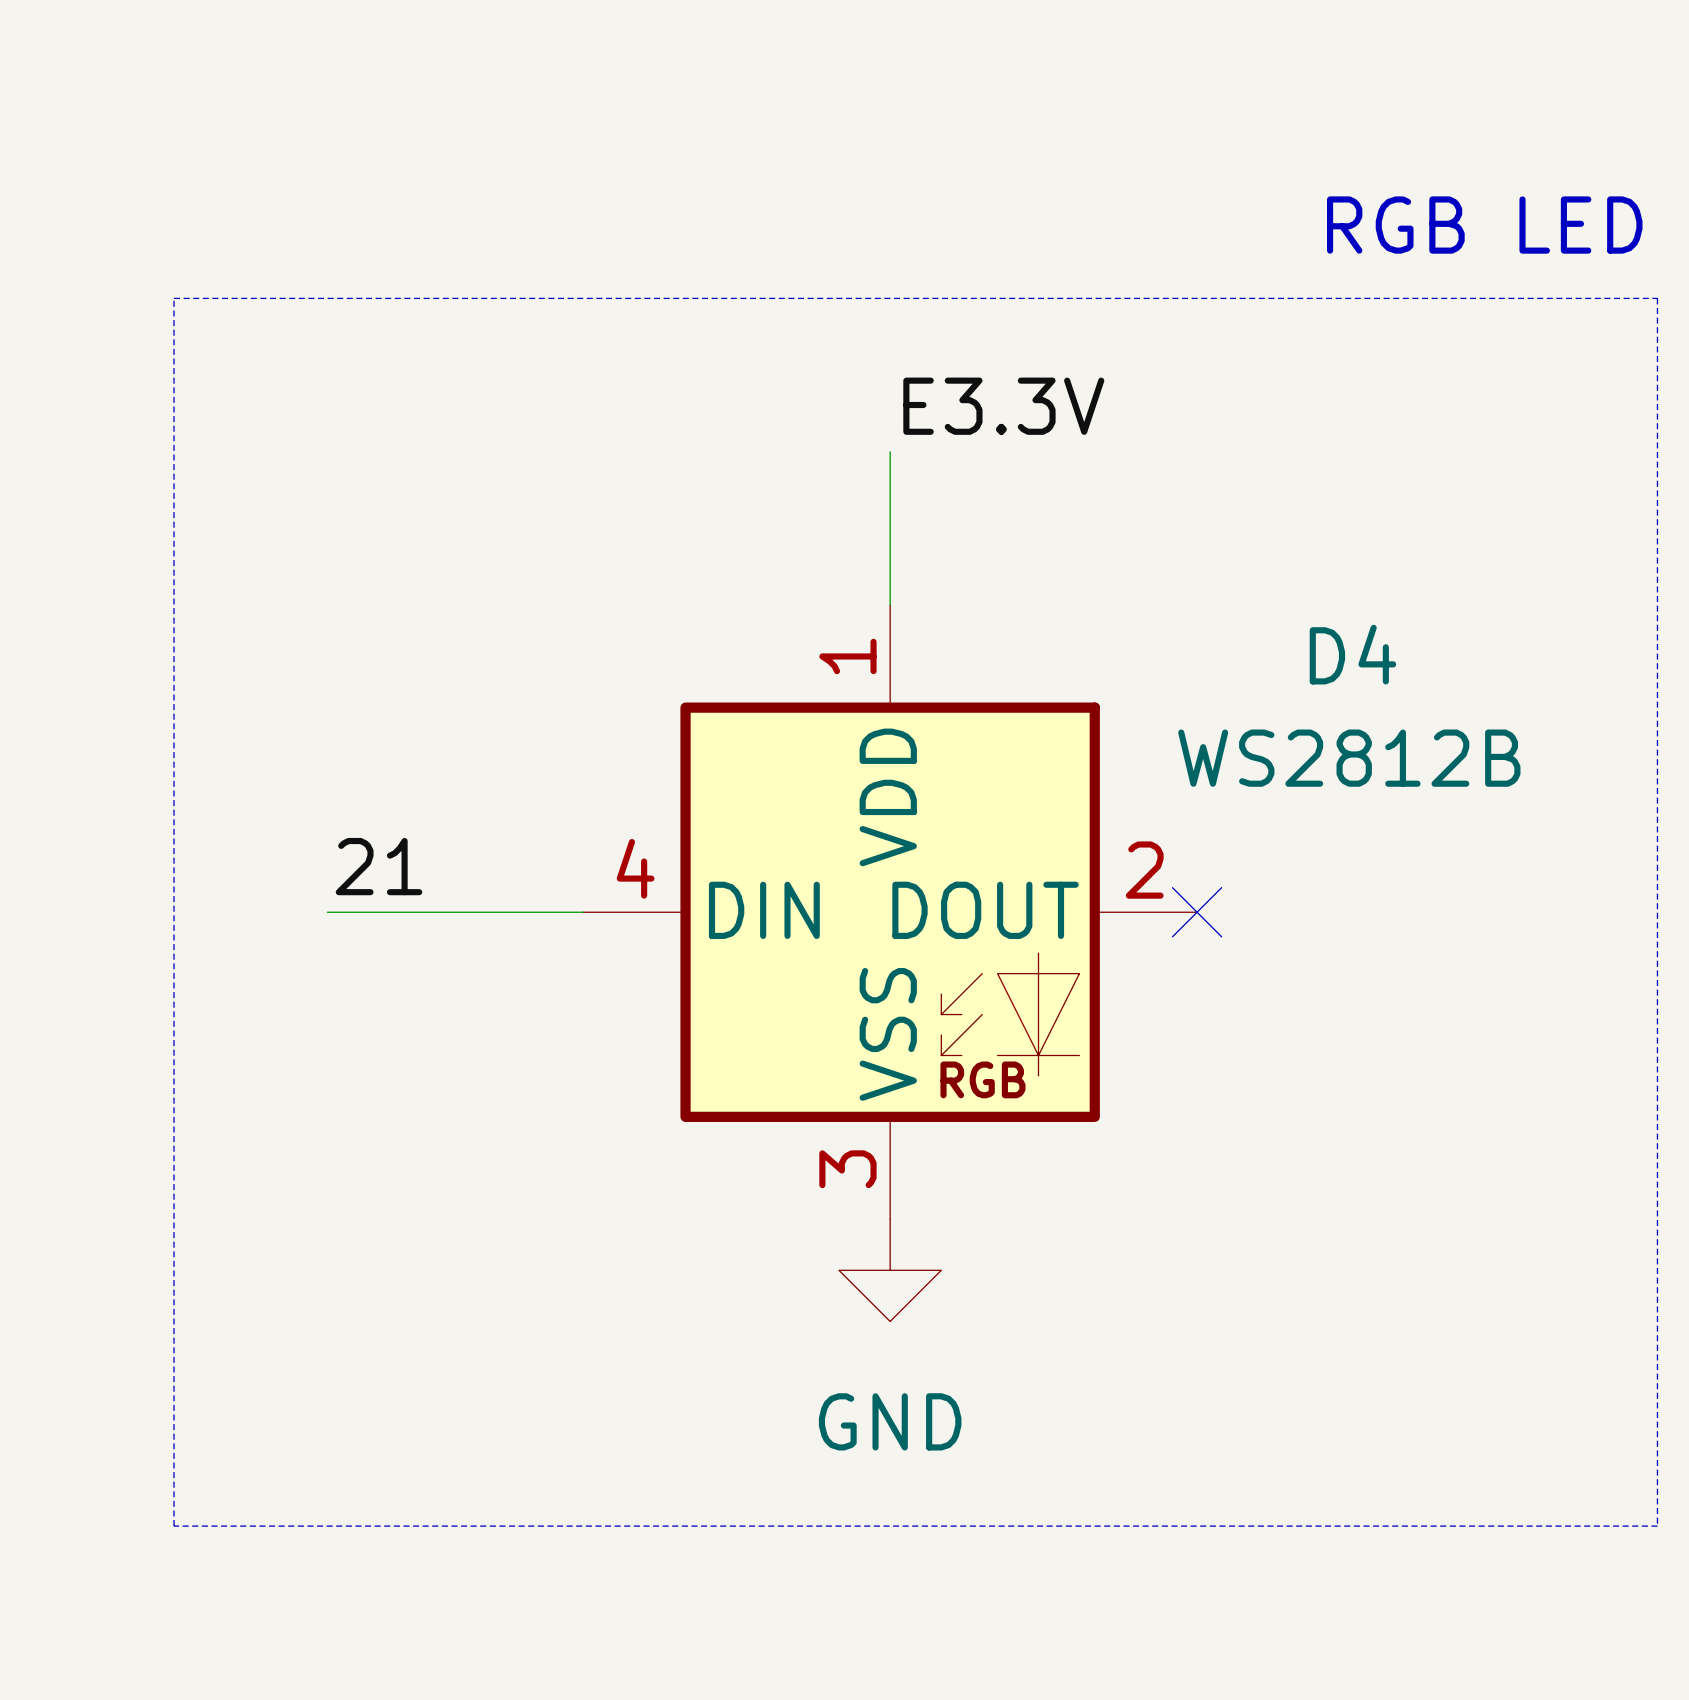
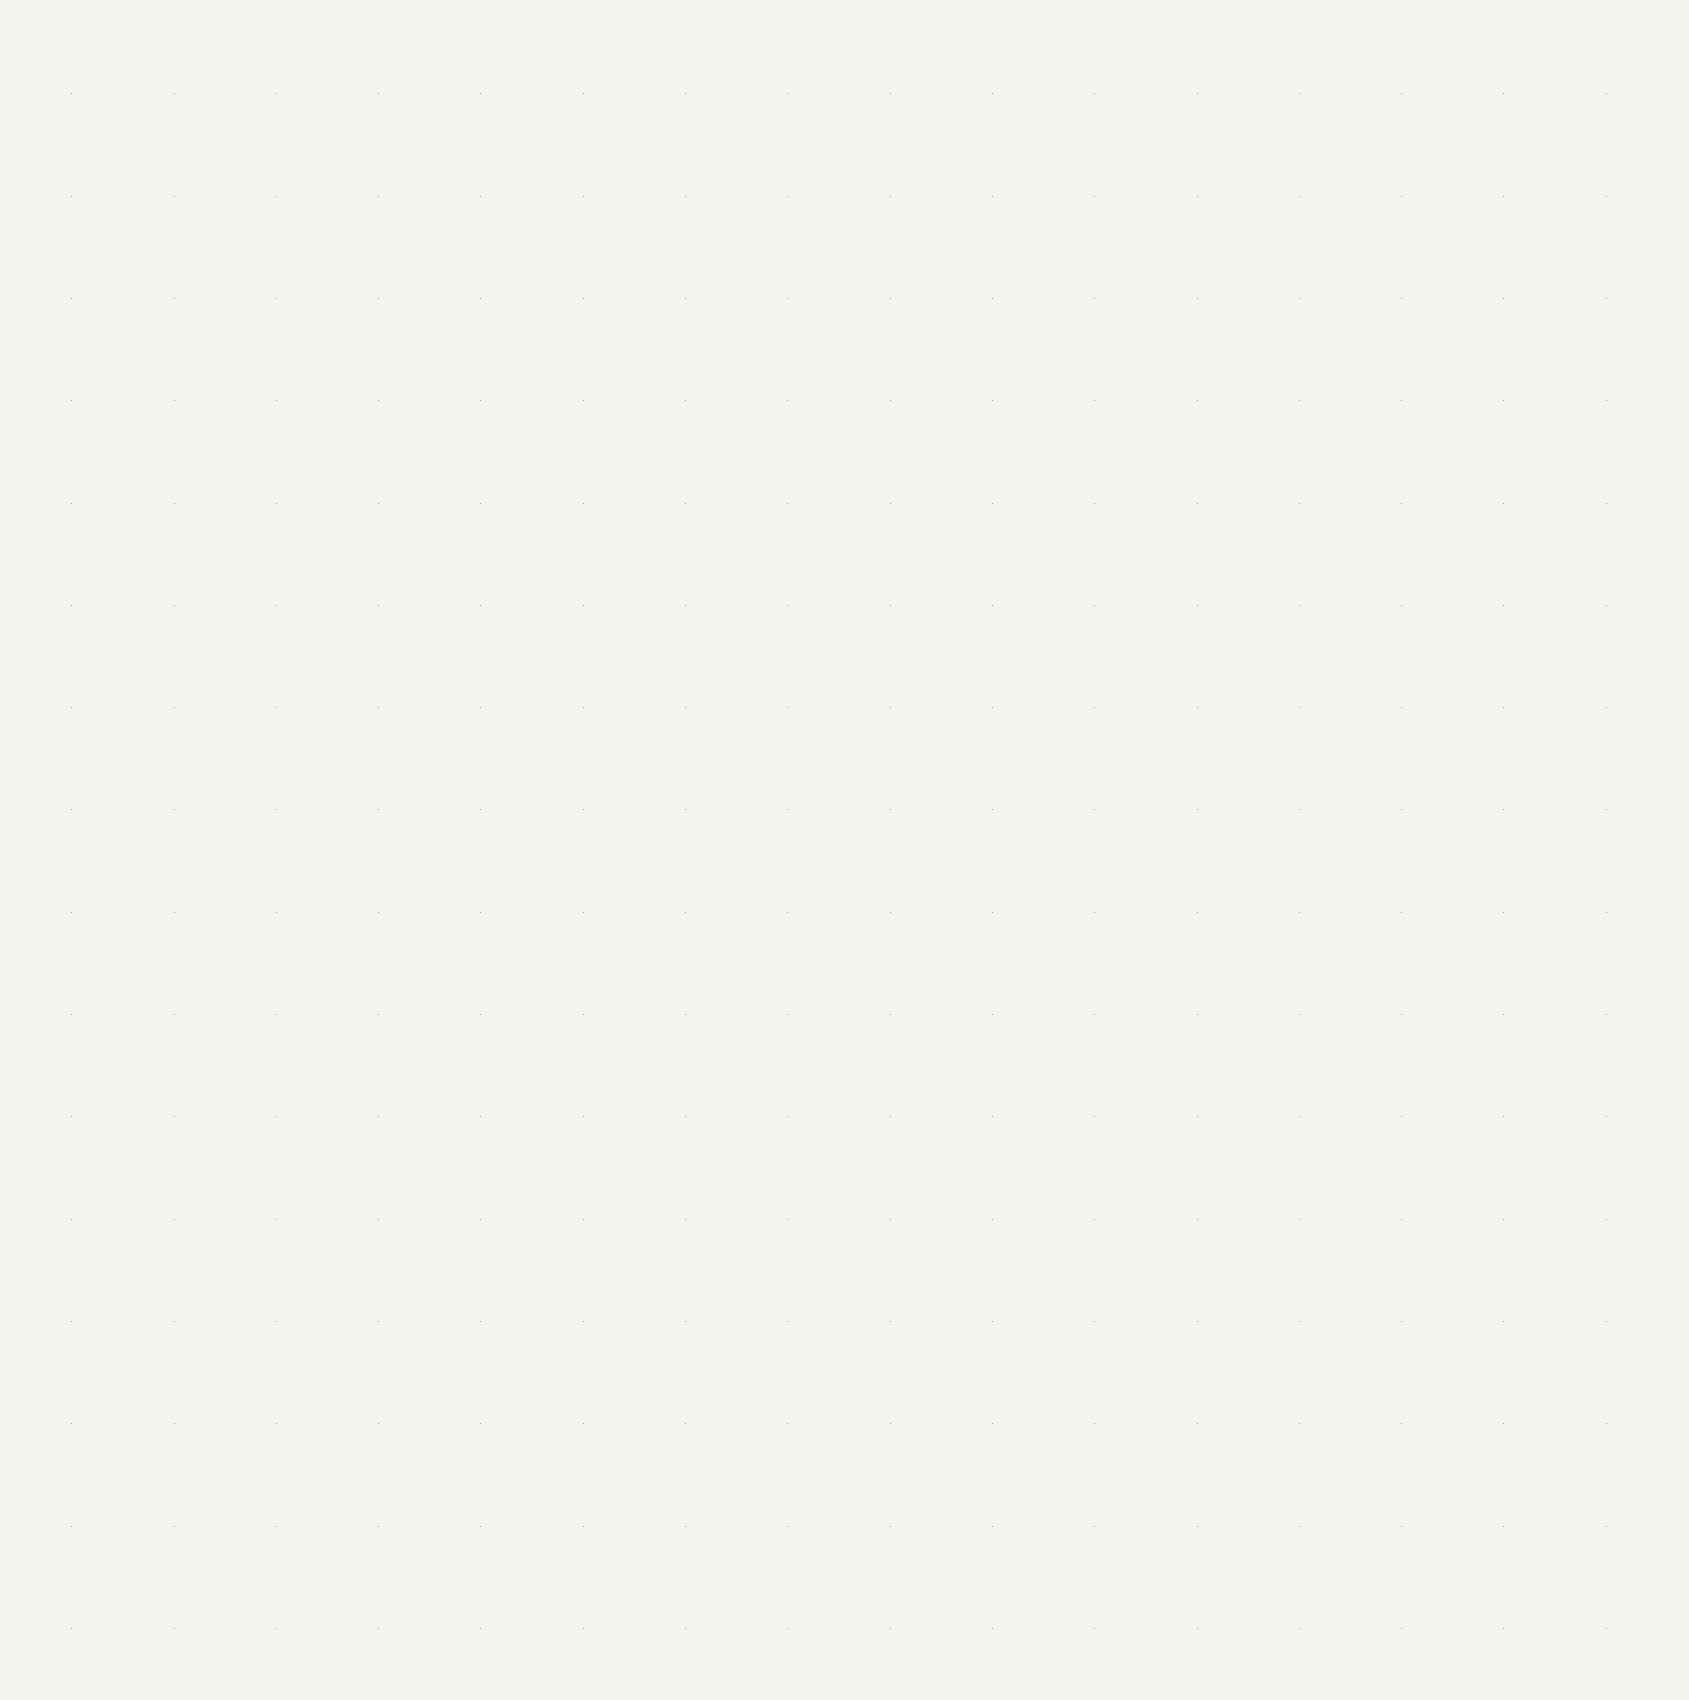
text: RGB LED (1484, 225) -> none
line: (174, 298) (1657, 298) (1657, 1526) (174, 1526) (174, 298) -> none
label: E3.3V (1003, 406) -> none
wire: (890, 451) (890, 605) -> none
label: 21 (379, 866) -> none
wire: (327, 912) (583, 912) -> none
D4: WS2812B (890, 912) -> none
no-connect mark: (1197, 912) -> none
power symbol: GND (890, 1270) -> none

